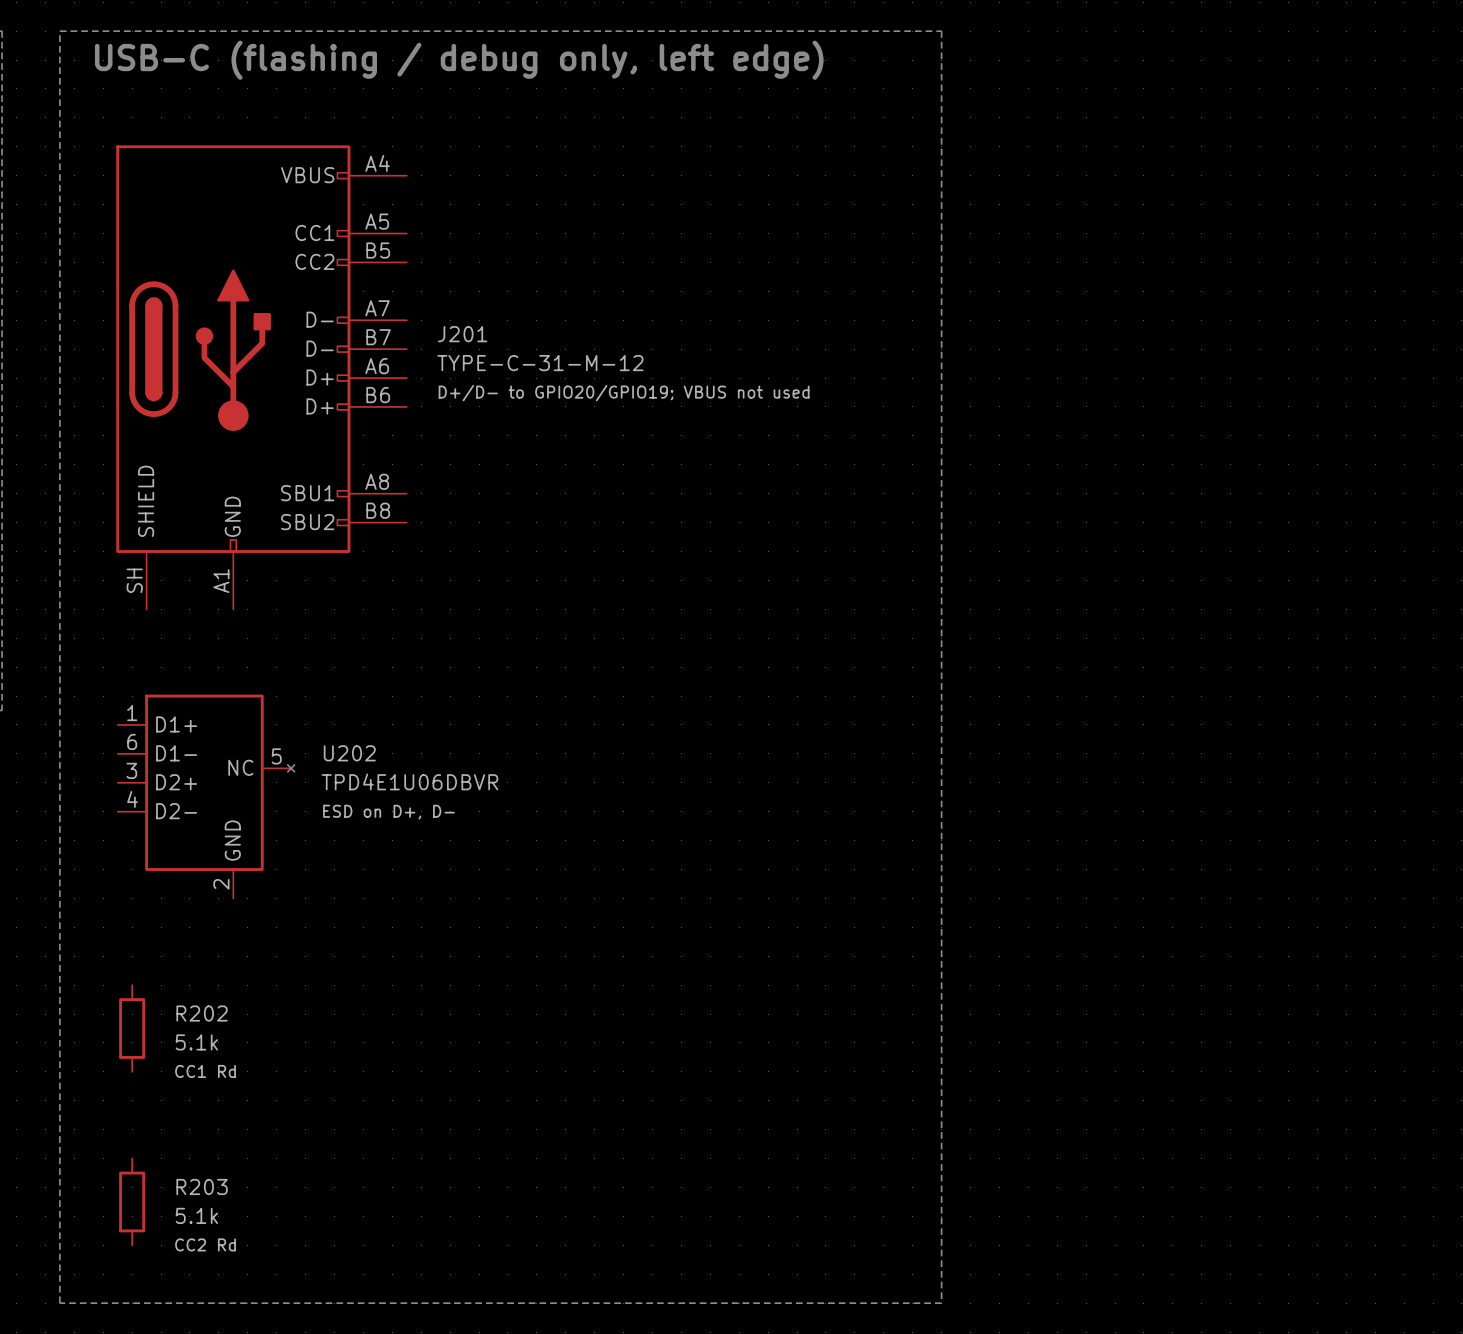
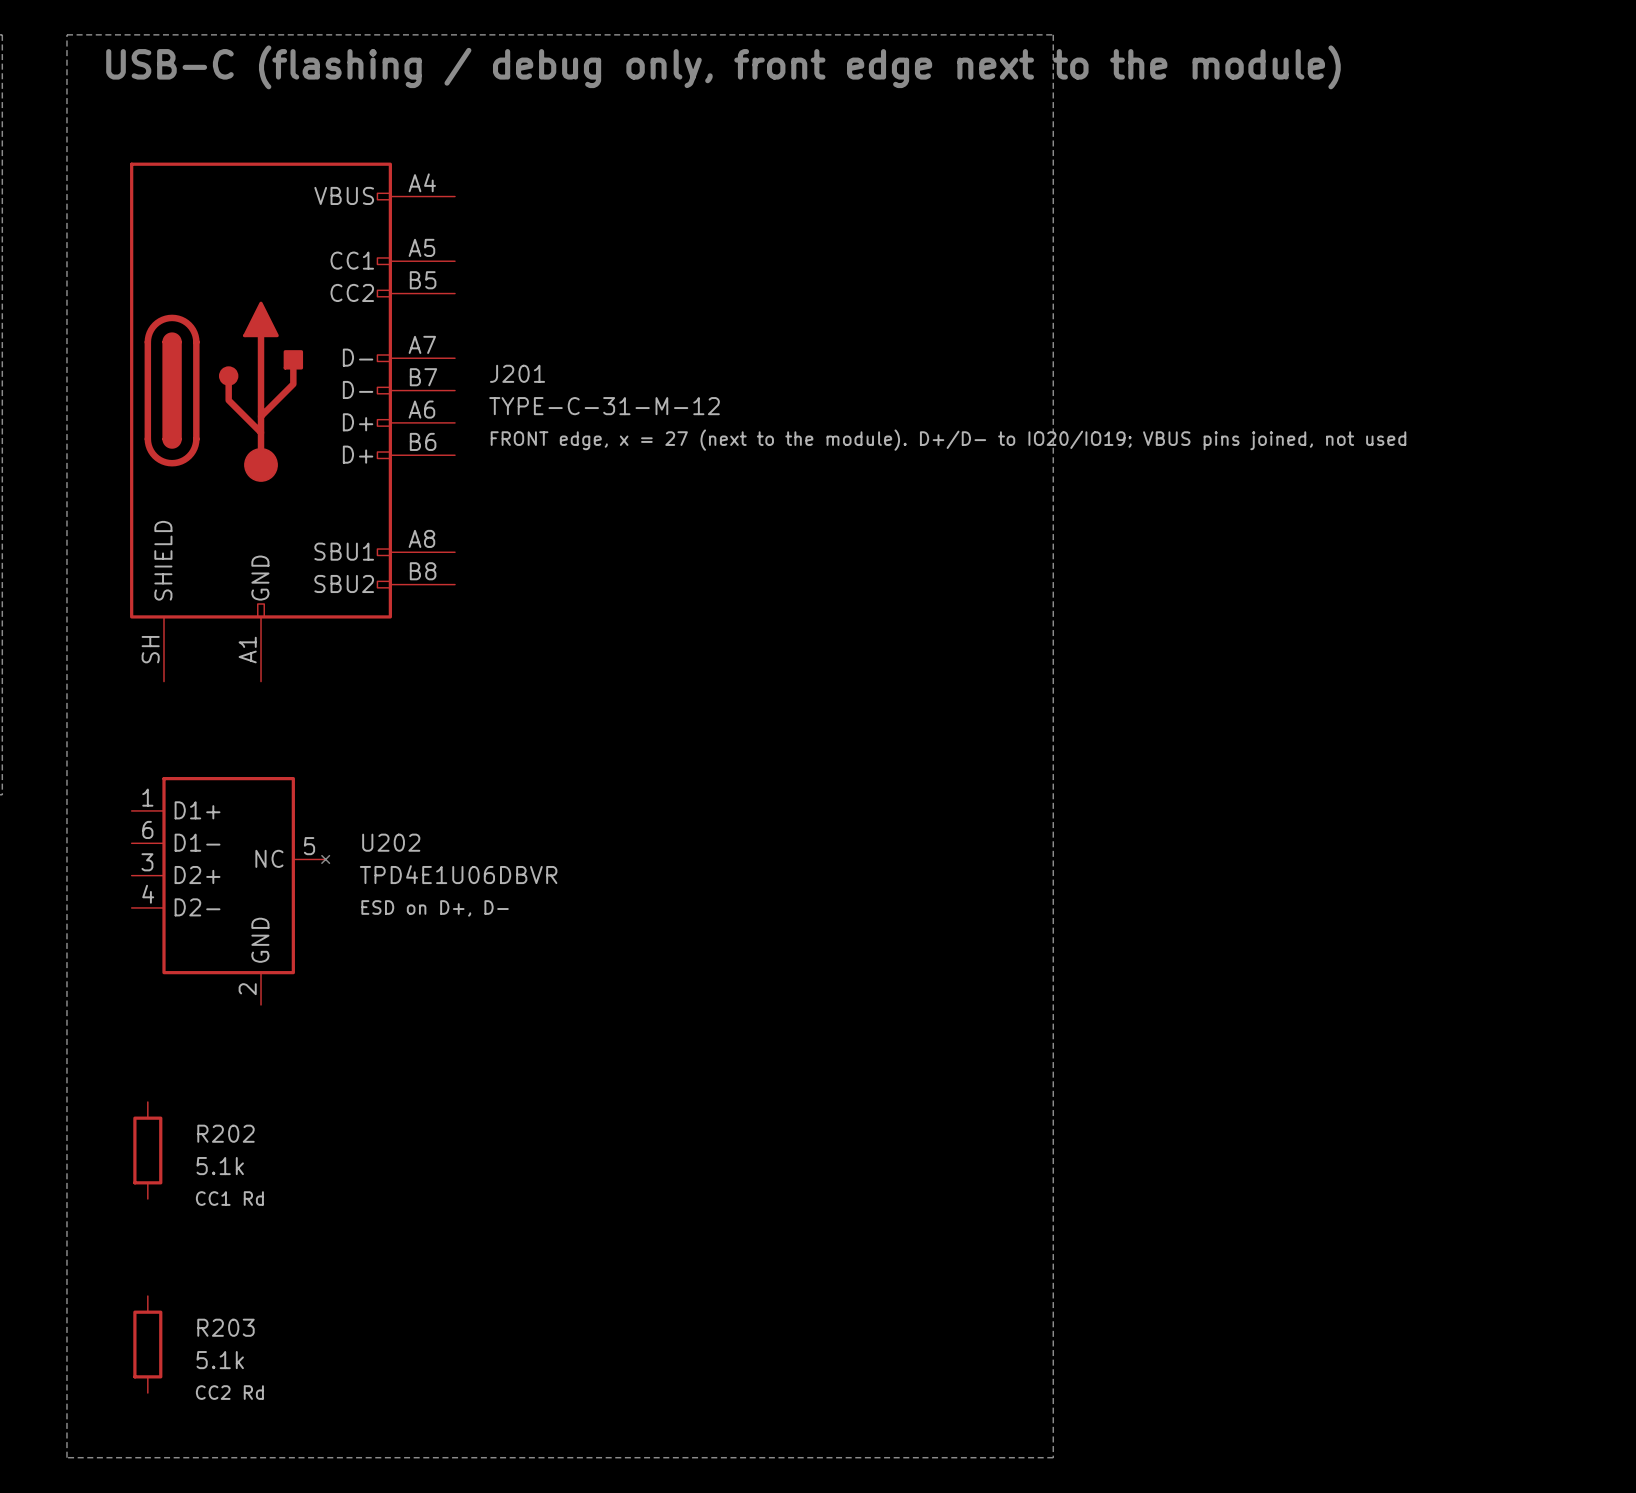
text: USB-C (flashing / debug only, left edge) (459, 60) -> USB-C (flashing / debug only, front edge next to the module) (723, 67)
J201 text: D+/D- to GPIO20/GPIO19; VBUS not used (624, 393) -> FRONT edge, x = 27 (next to the module). D+/D- to IO20/IO19; VBUS pins joined, not used (948, 440)

